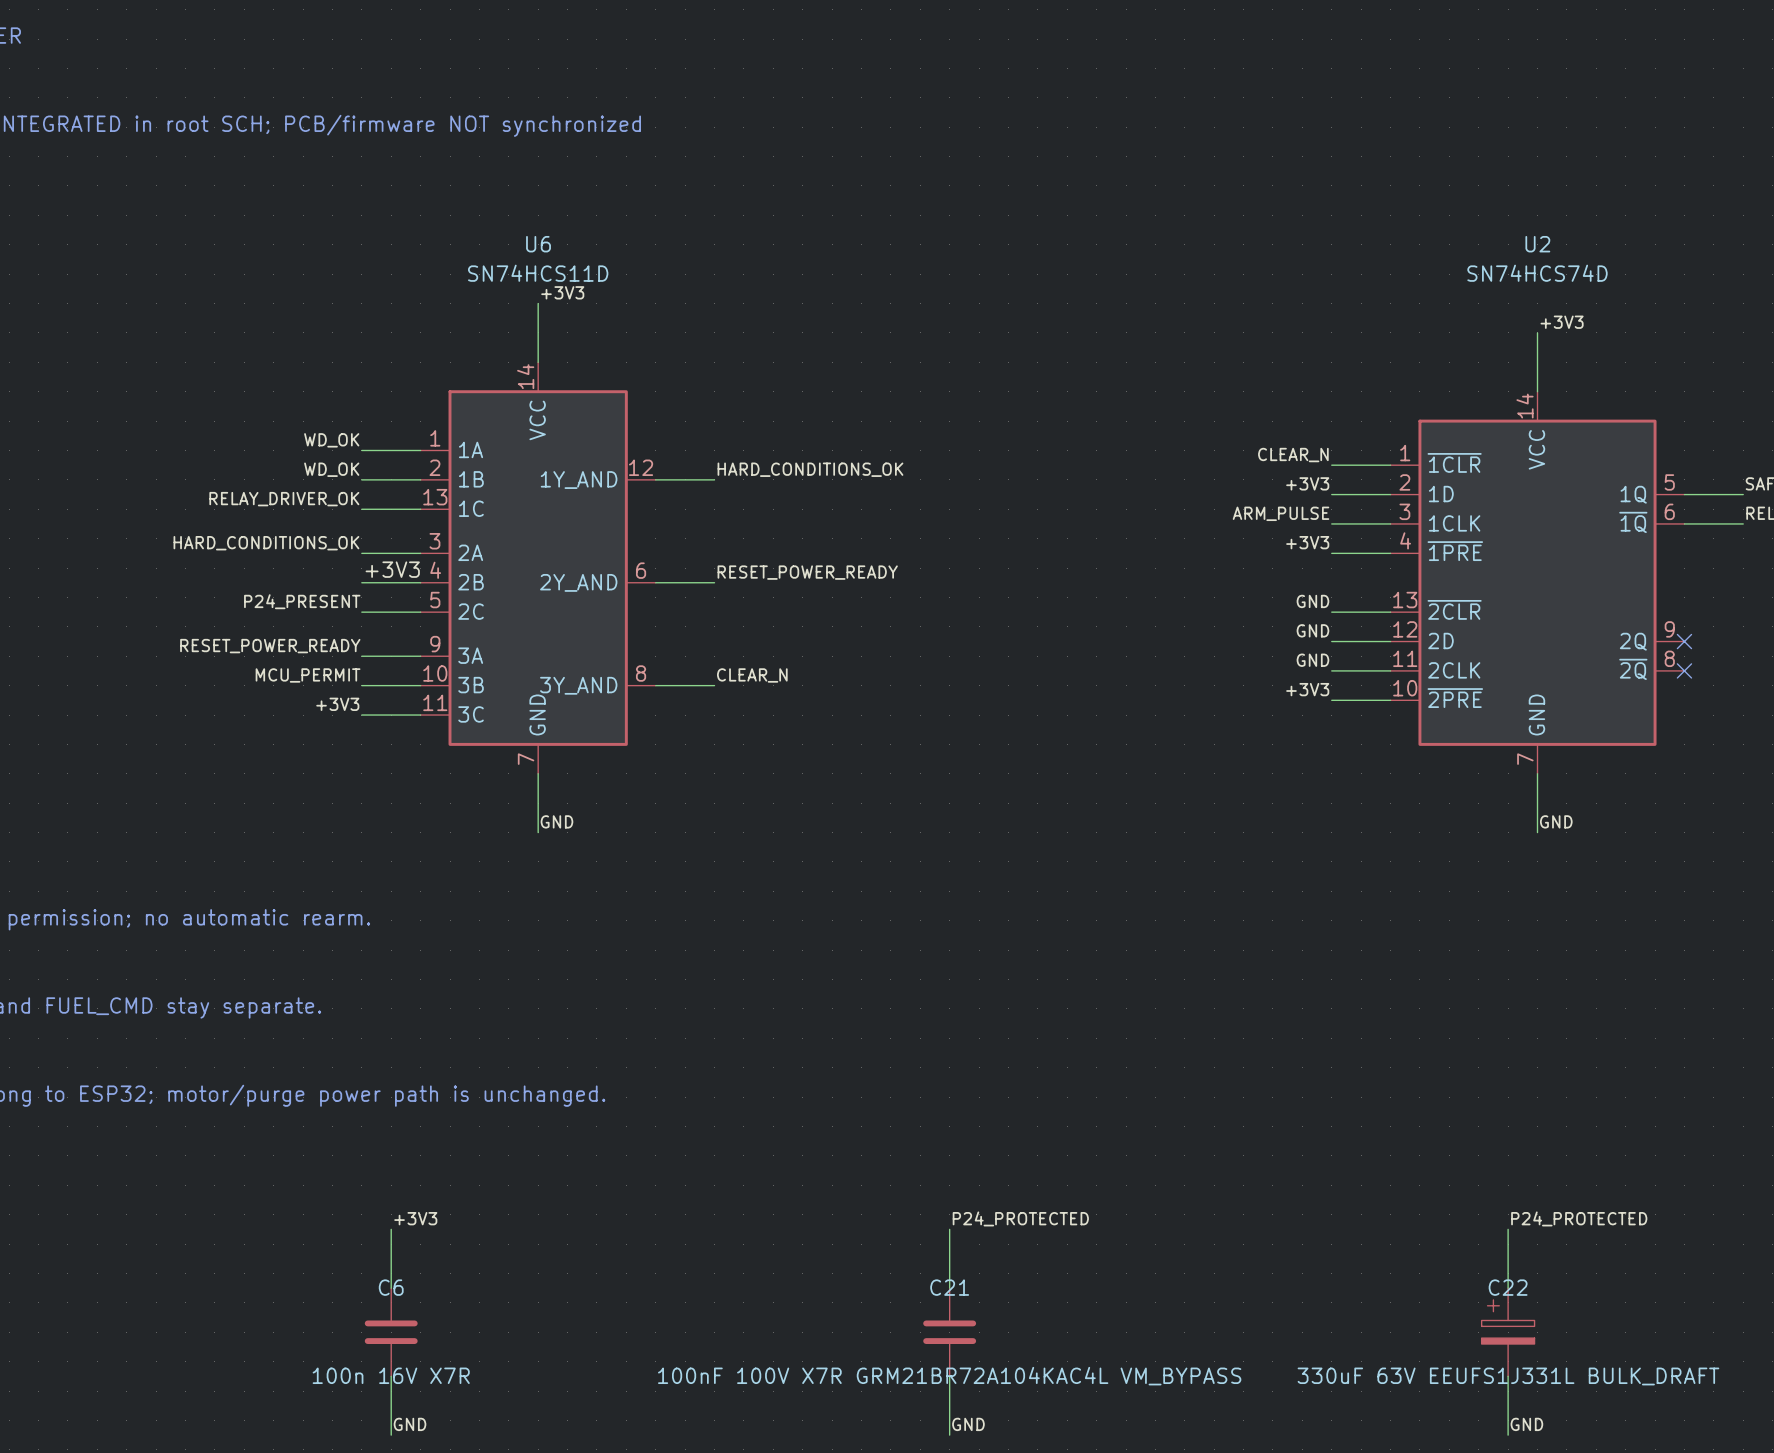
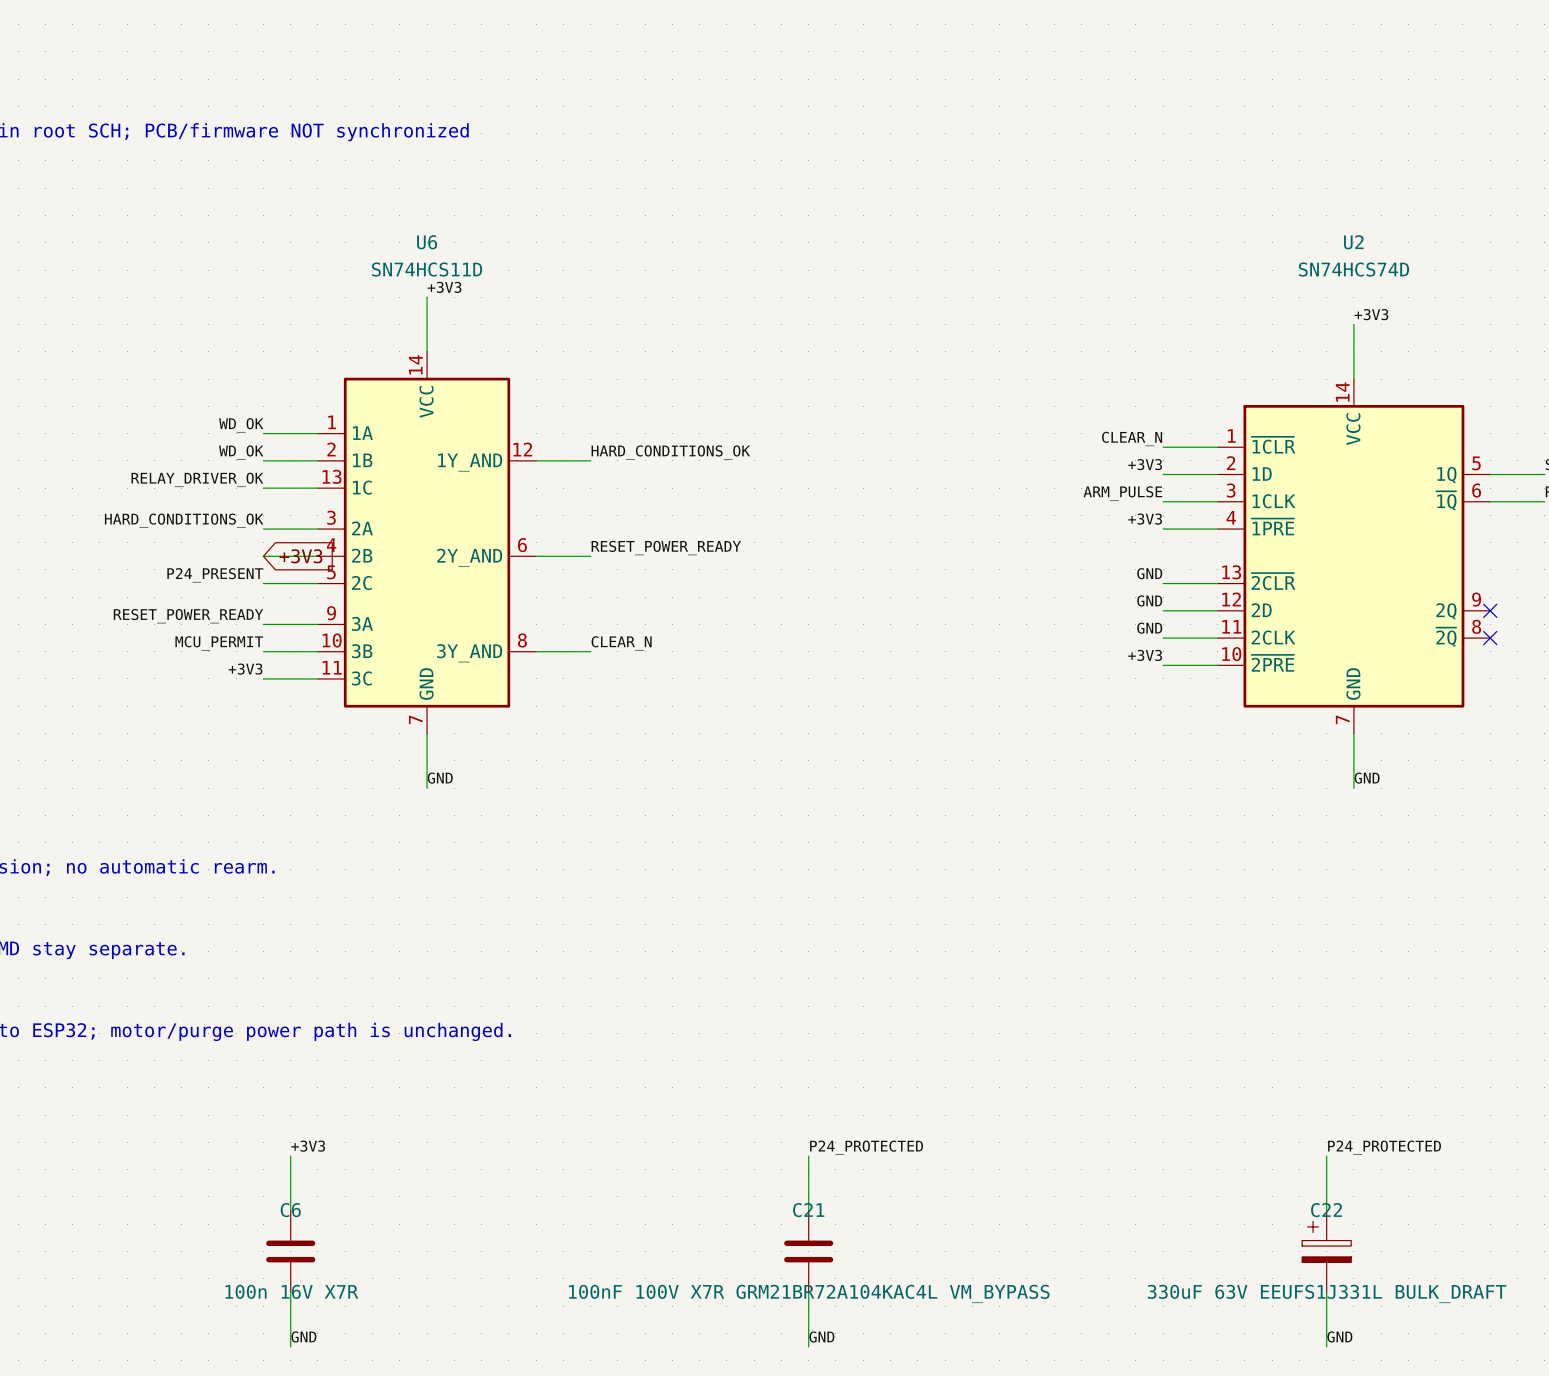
label: +3V3 (392, 569) -> none
global label: none -> +3V3 (301, 556)

